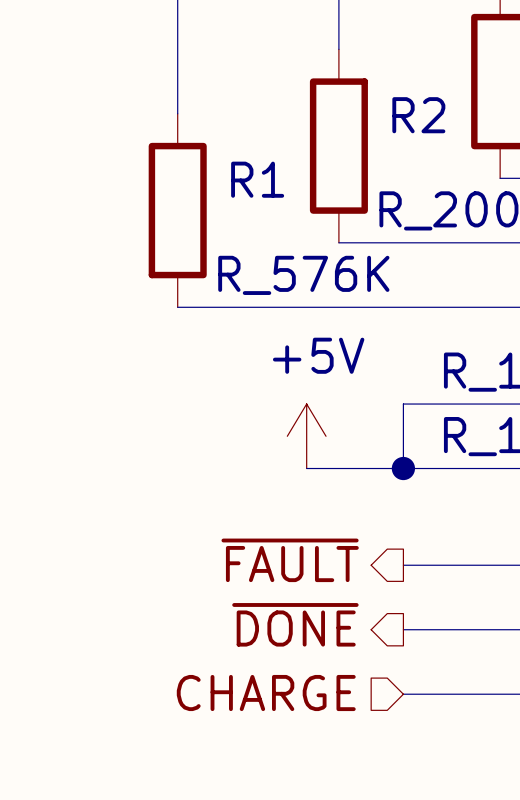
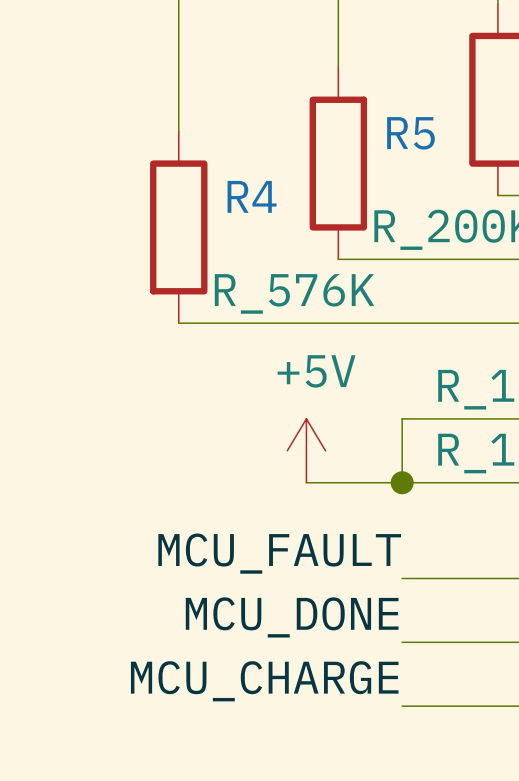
R2 name: R2 (418, 115) -> R5 (410, 133)
R1 name: R1 (257, 179) -> R4 (252, 196)
label: none -> MCU_FAULT (279, 553)
hierarchical label: ~{FAULT} (290, 560) -> none
label: none -> MCU_DONE (292, 617)
hierarchical label: ~{DONE} (295, 624) -> none
label: none -> MCU_CHARGE (264, 681)
hierarchical label: CHARGE (266, 693) -> none

